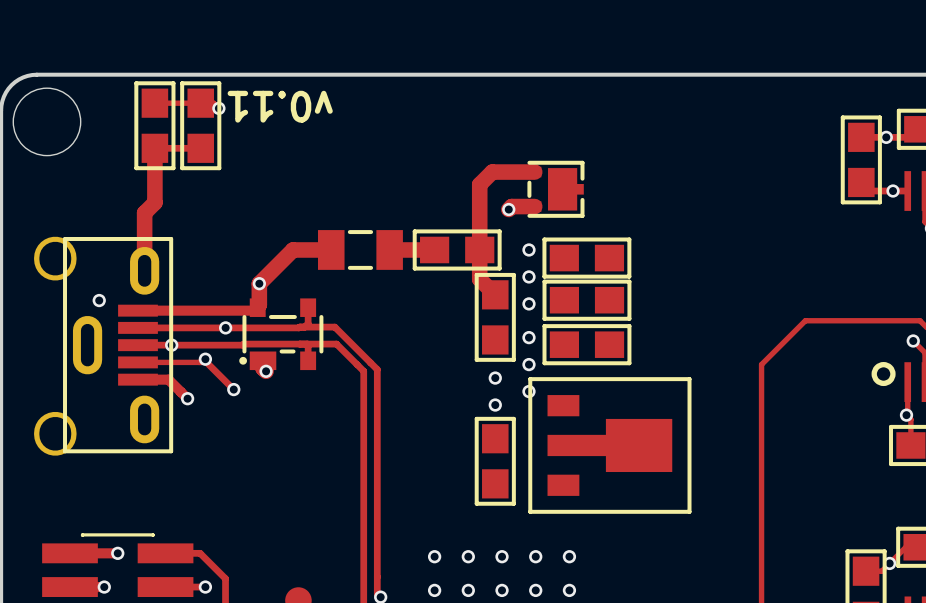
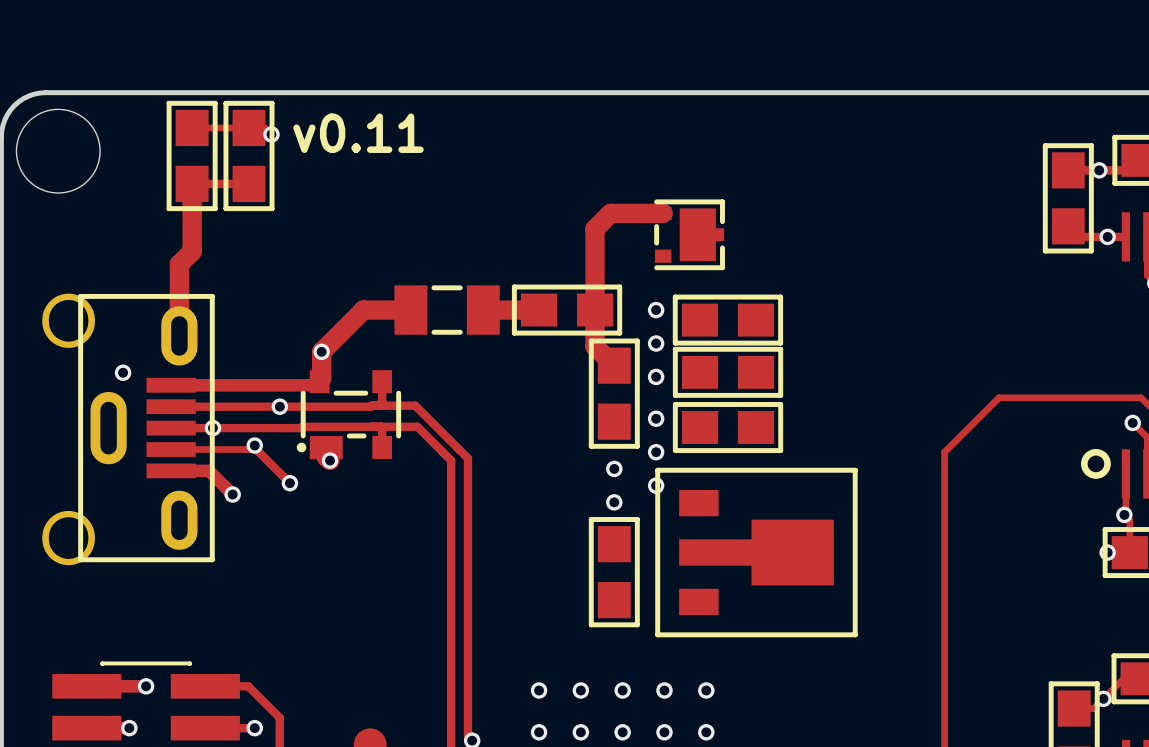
text rotation: 0° (280, 106) -> 180° (358, 133)
track: (534, 206) (511, 206) (508, 209) -> none
via: (508, 209) -> none
via: none -> (1107, 552)

